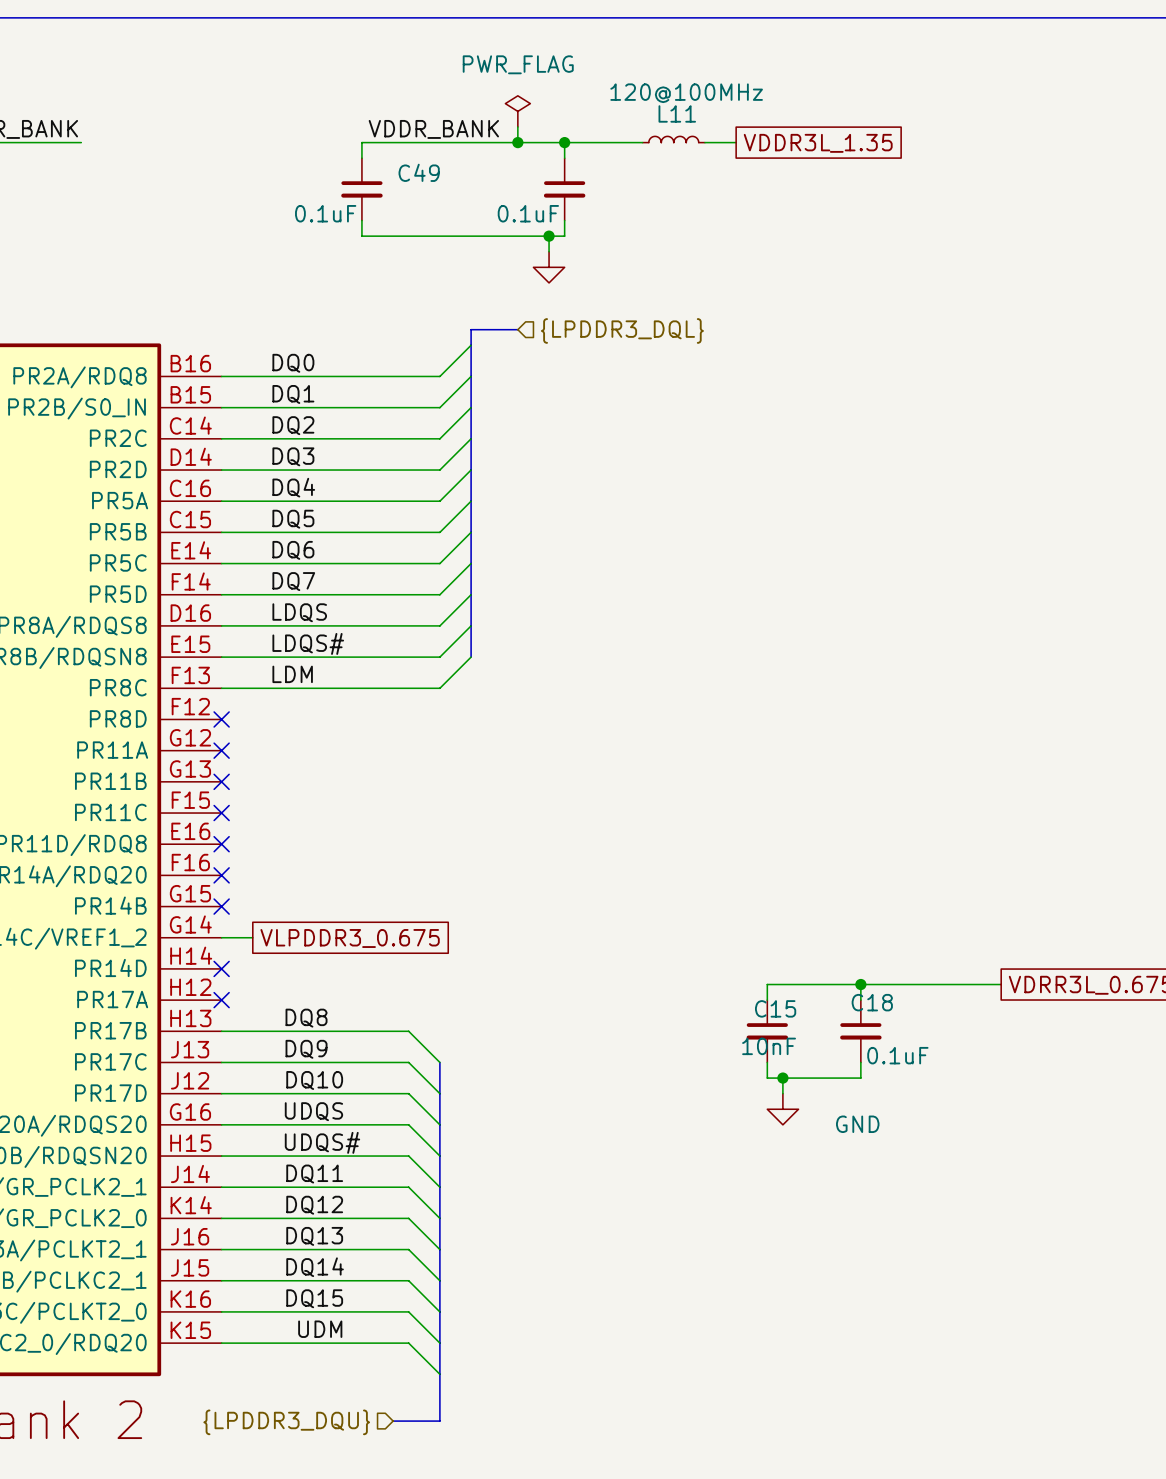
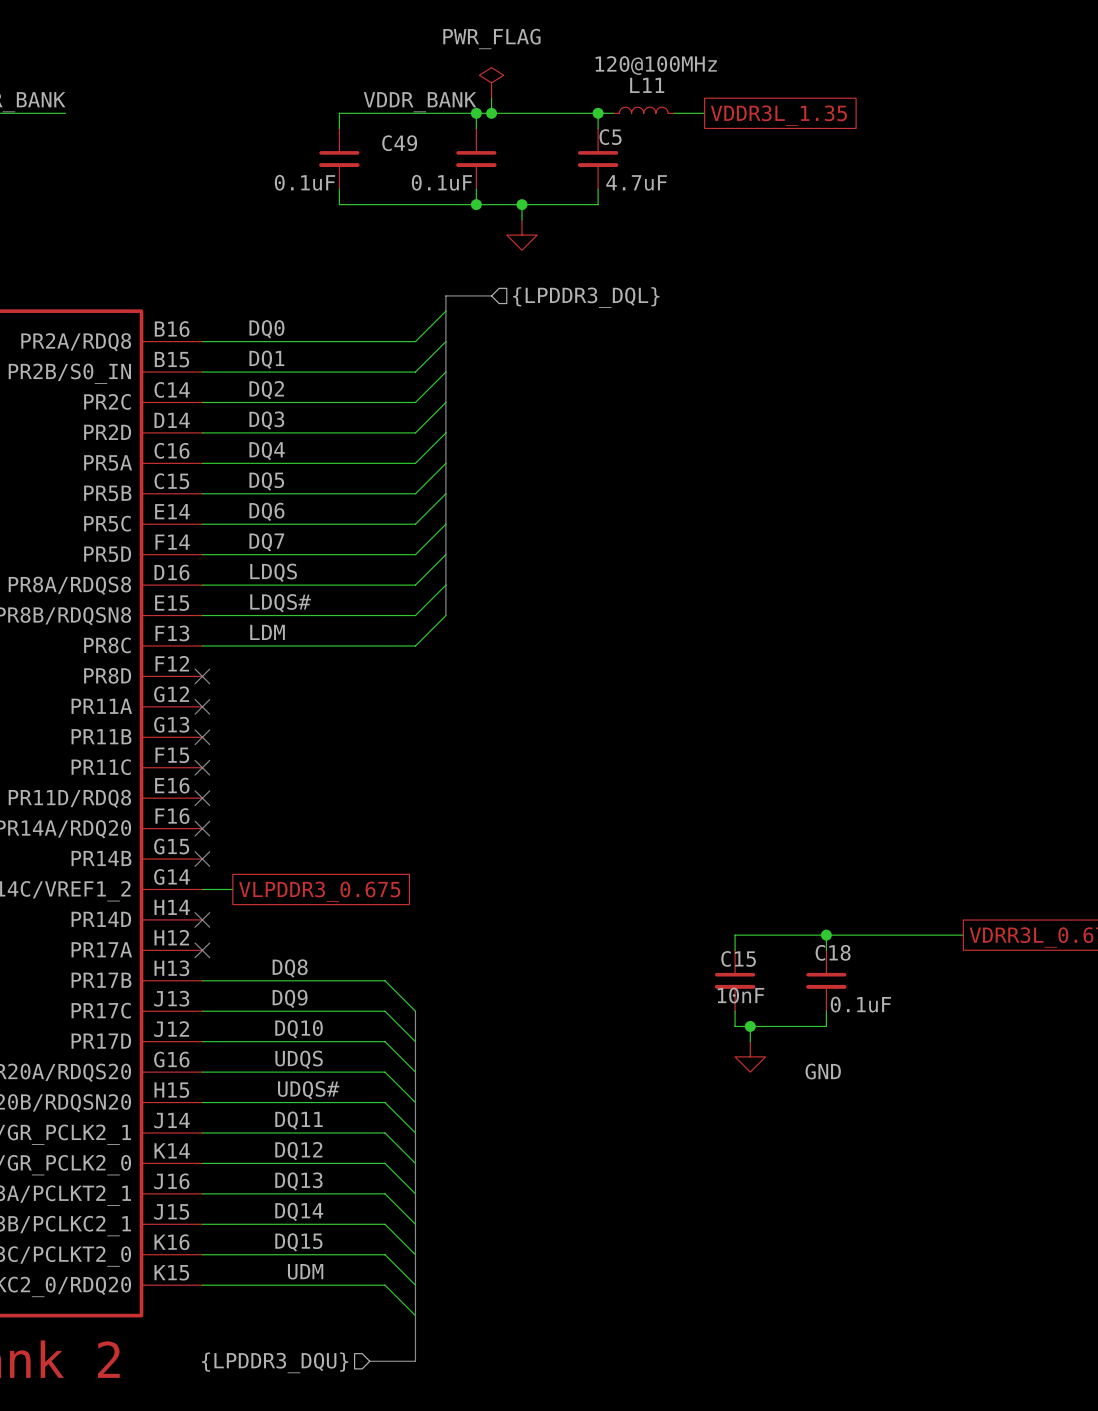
junction: none -> (476, 113)
wire: (564, 142) (564, 158) -> (476, 113) (476, 128)
junction: (564, 142) -> none
wire: none -> (598, 113) (598, 128)
junction: none -> (598, 113)
part position: (564, 189) -> (476, 158)
C5: none -> 4.7uF (598, 158)
wire: none -> (476, 189) (476, 204)
wire: (564, 220) (564, 236) -> (598, 189) (598, 204) (537, 204)
junction: none -> (476, 204)

